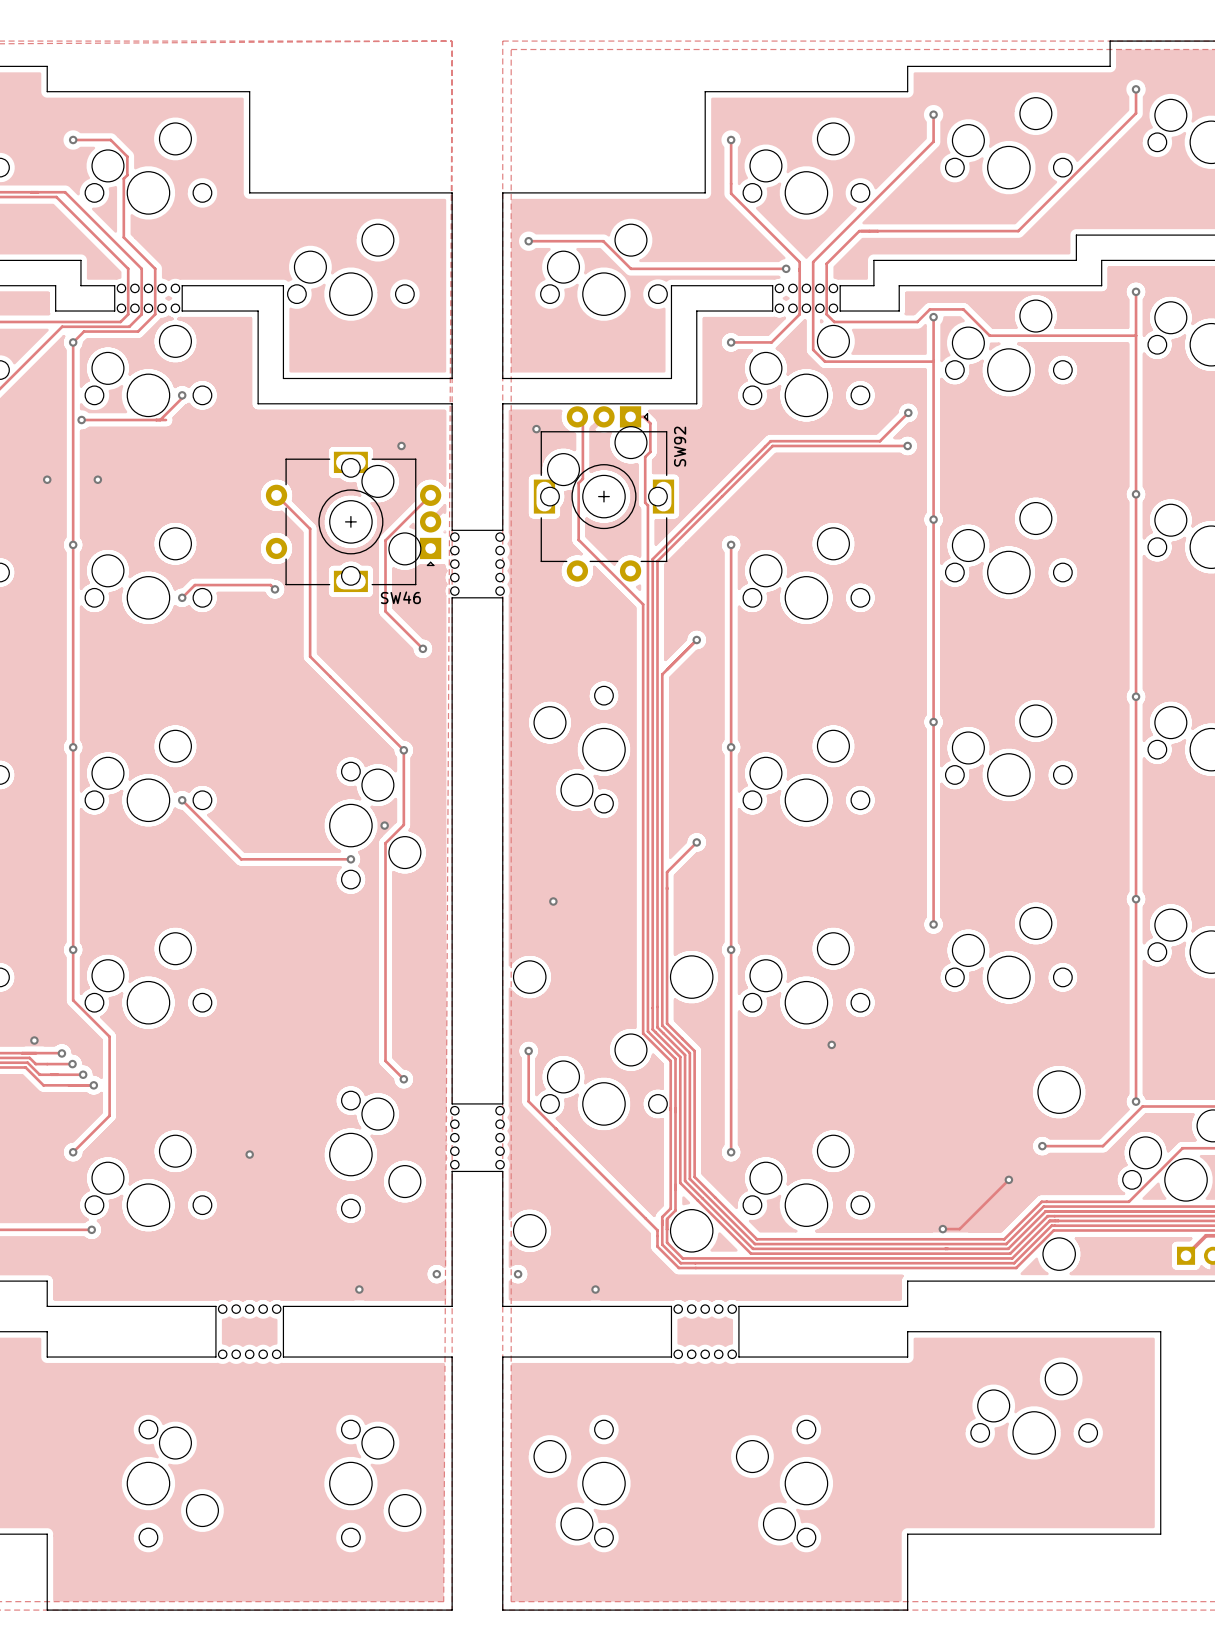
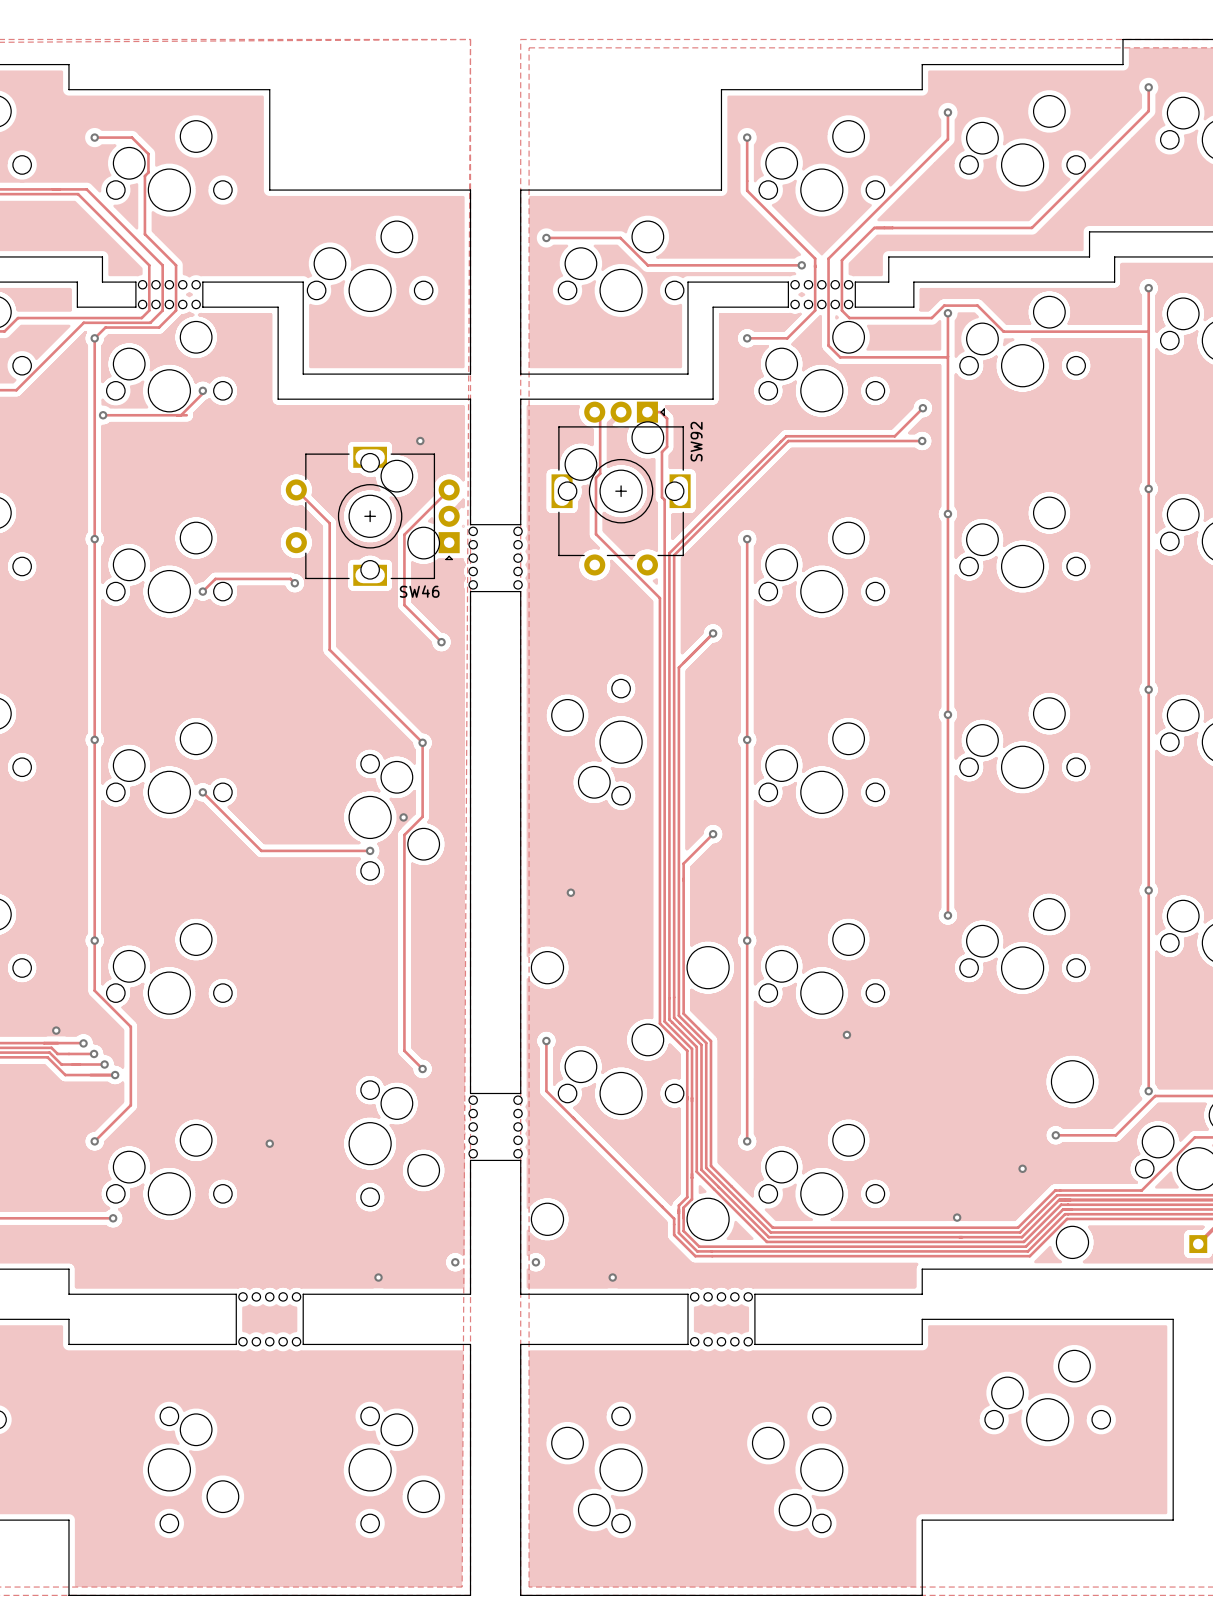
via: (536, 429) -> none
via: (47, 479) -> none
via: (97, 479) -> none
track: (1008, 1179) (959, 1229) (942, 1229) -> none

